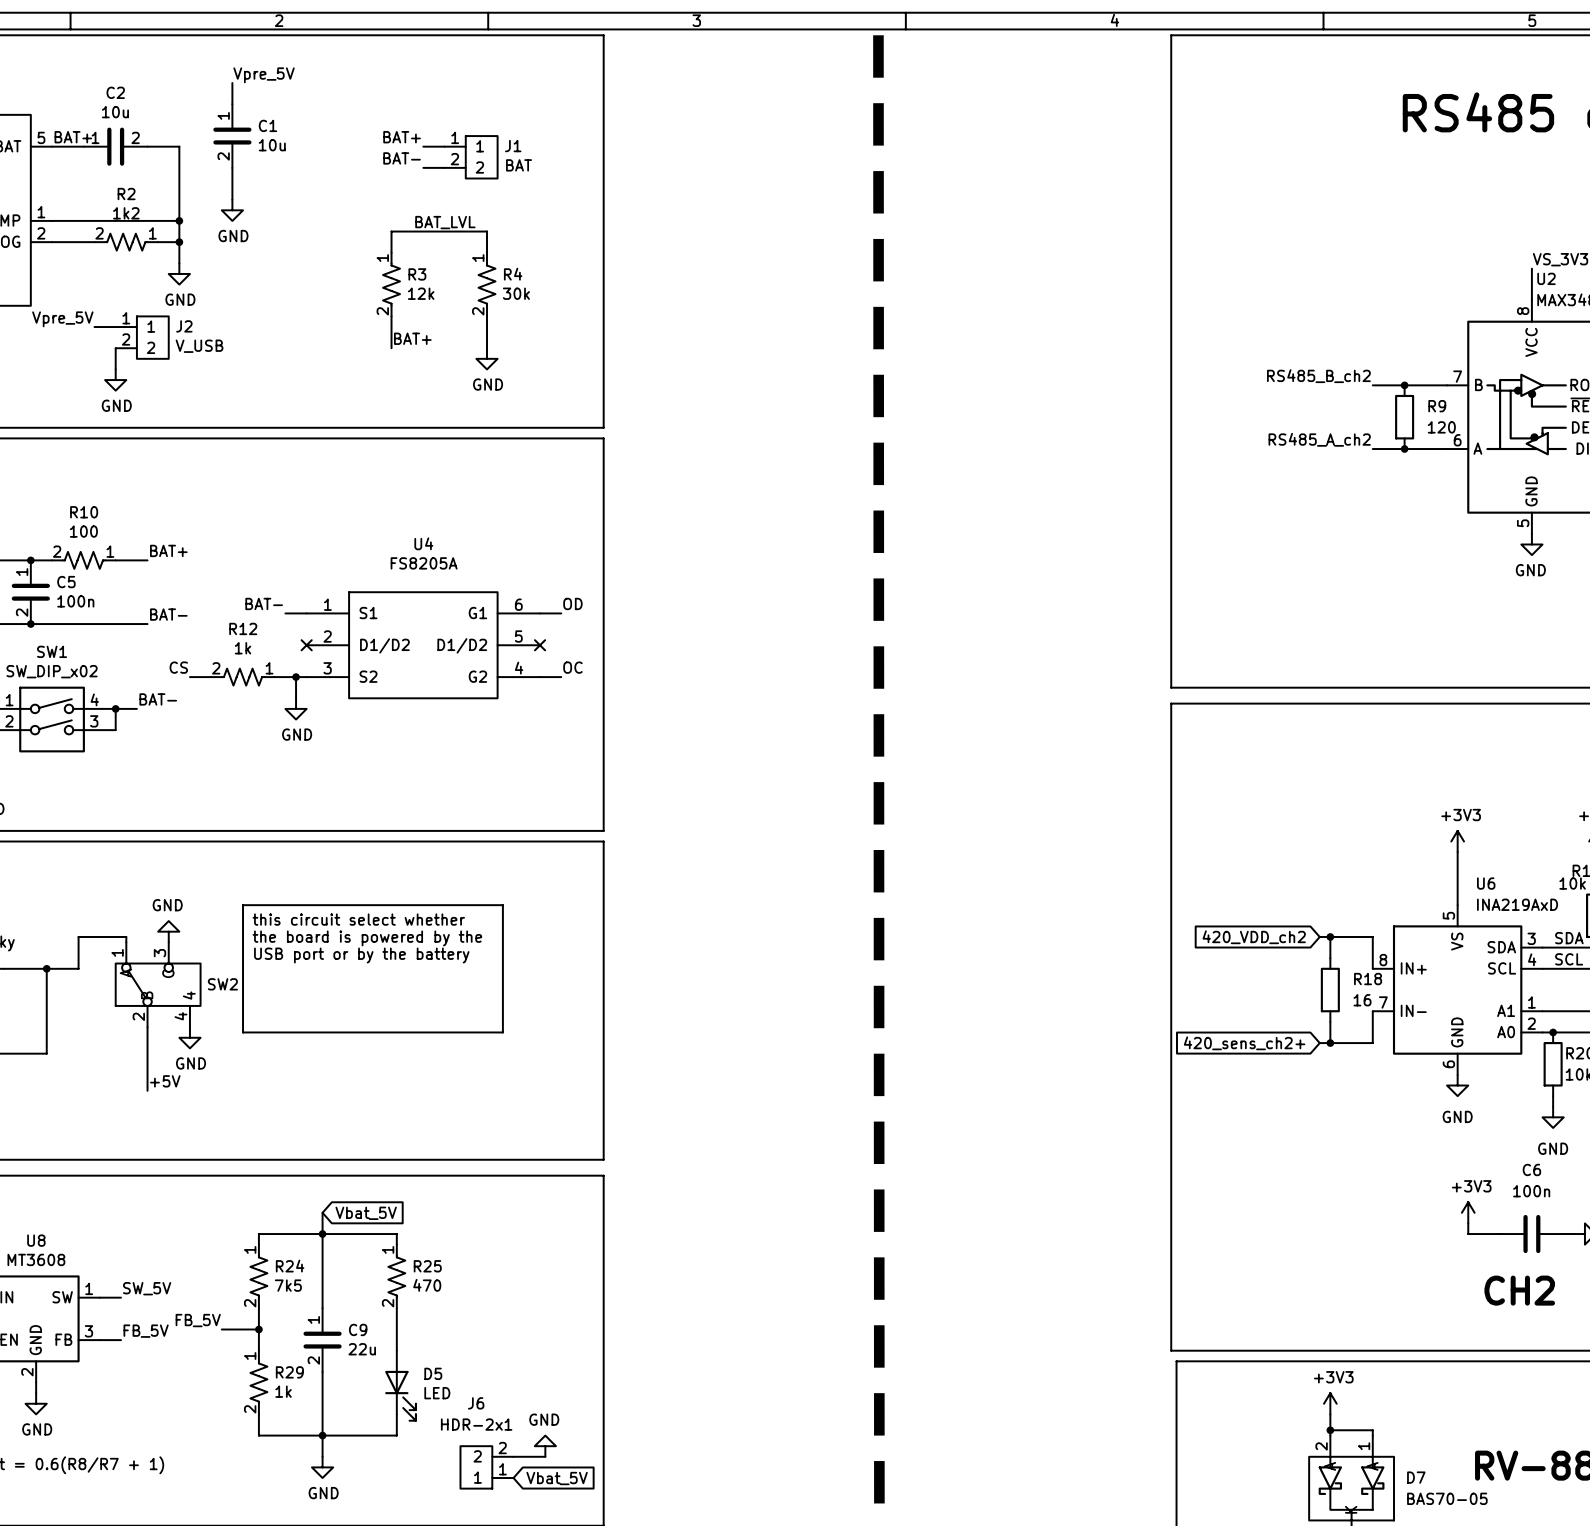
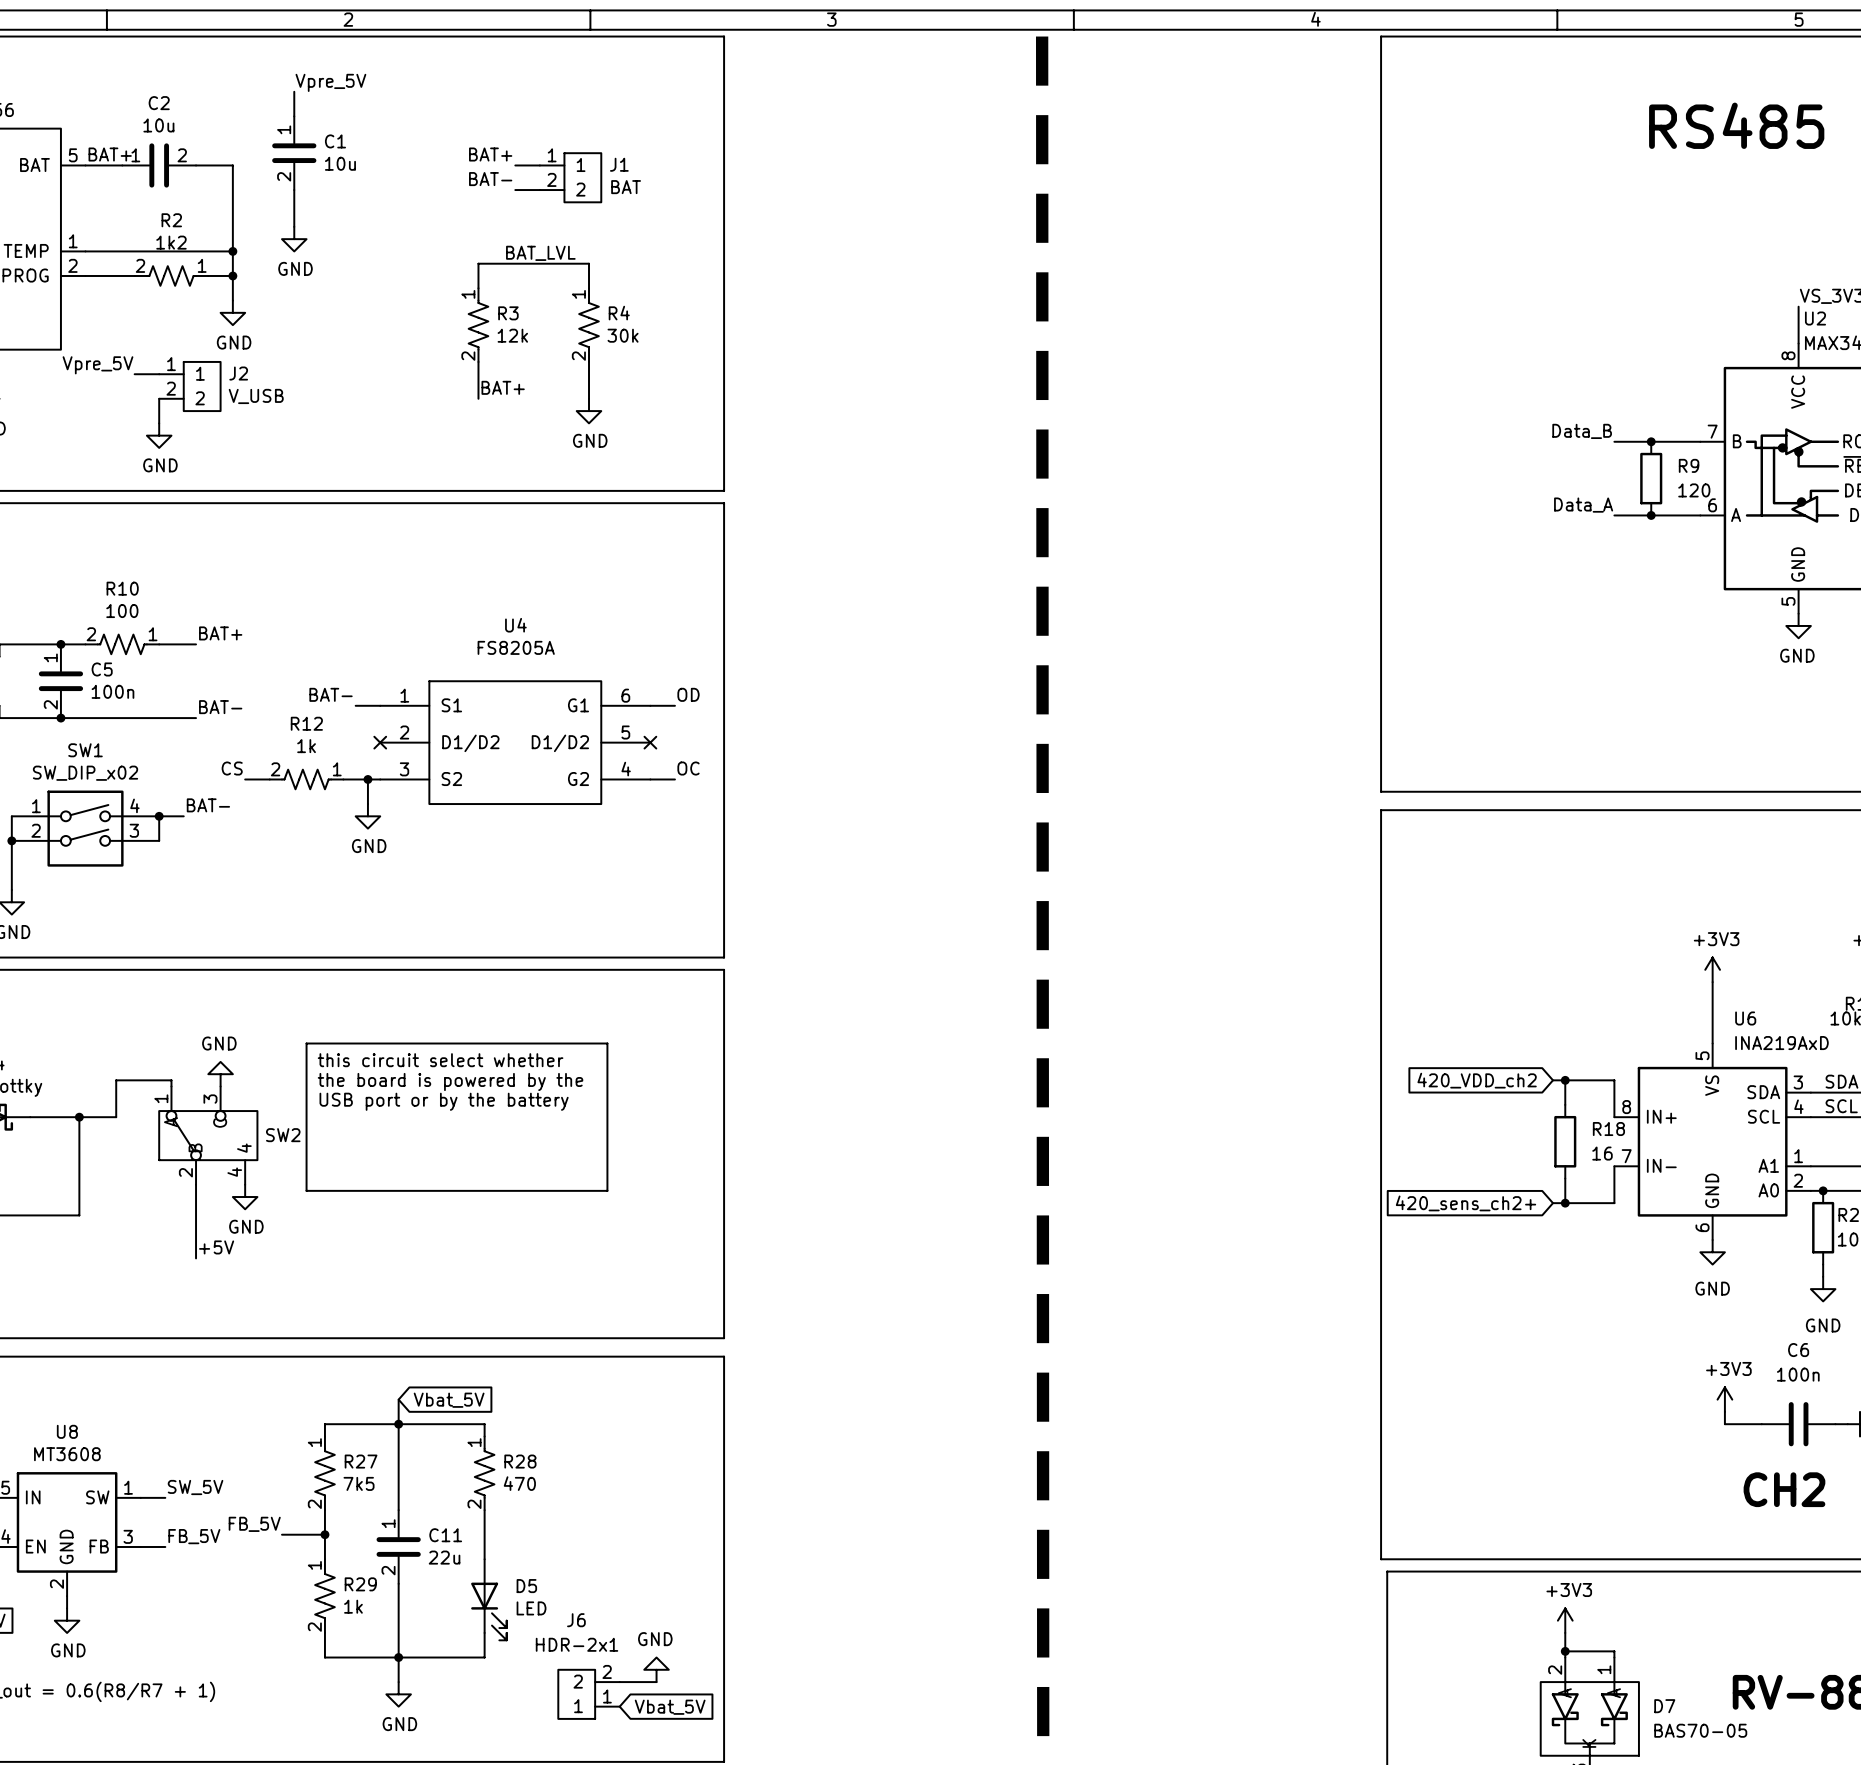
label: RS485_B_ch2 (1318, 376) -> Data_B (1582, 431)
label: RS485_A_ch2 (1319, 439) -> Data_A (1583, 505)
R24 name: R24 (290, 1266) -> R27 (361, 1461)
R25 name: R25 (427, 1266) -> R28 (520, 1461)
C9 name: C9 (358, 1329) -> C11 (445, 1535)

